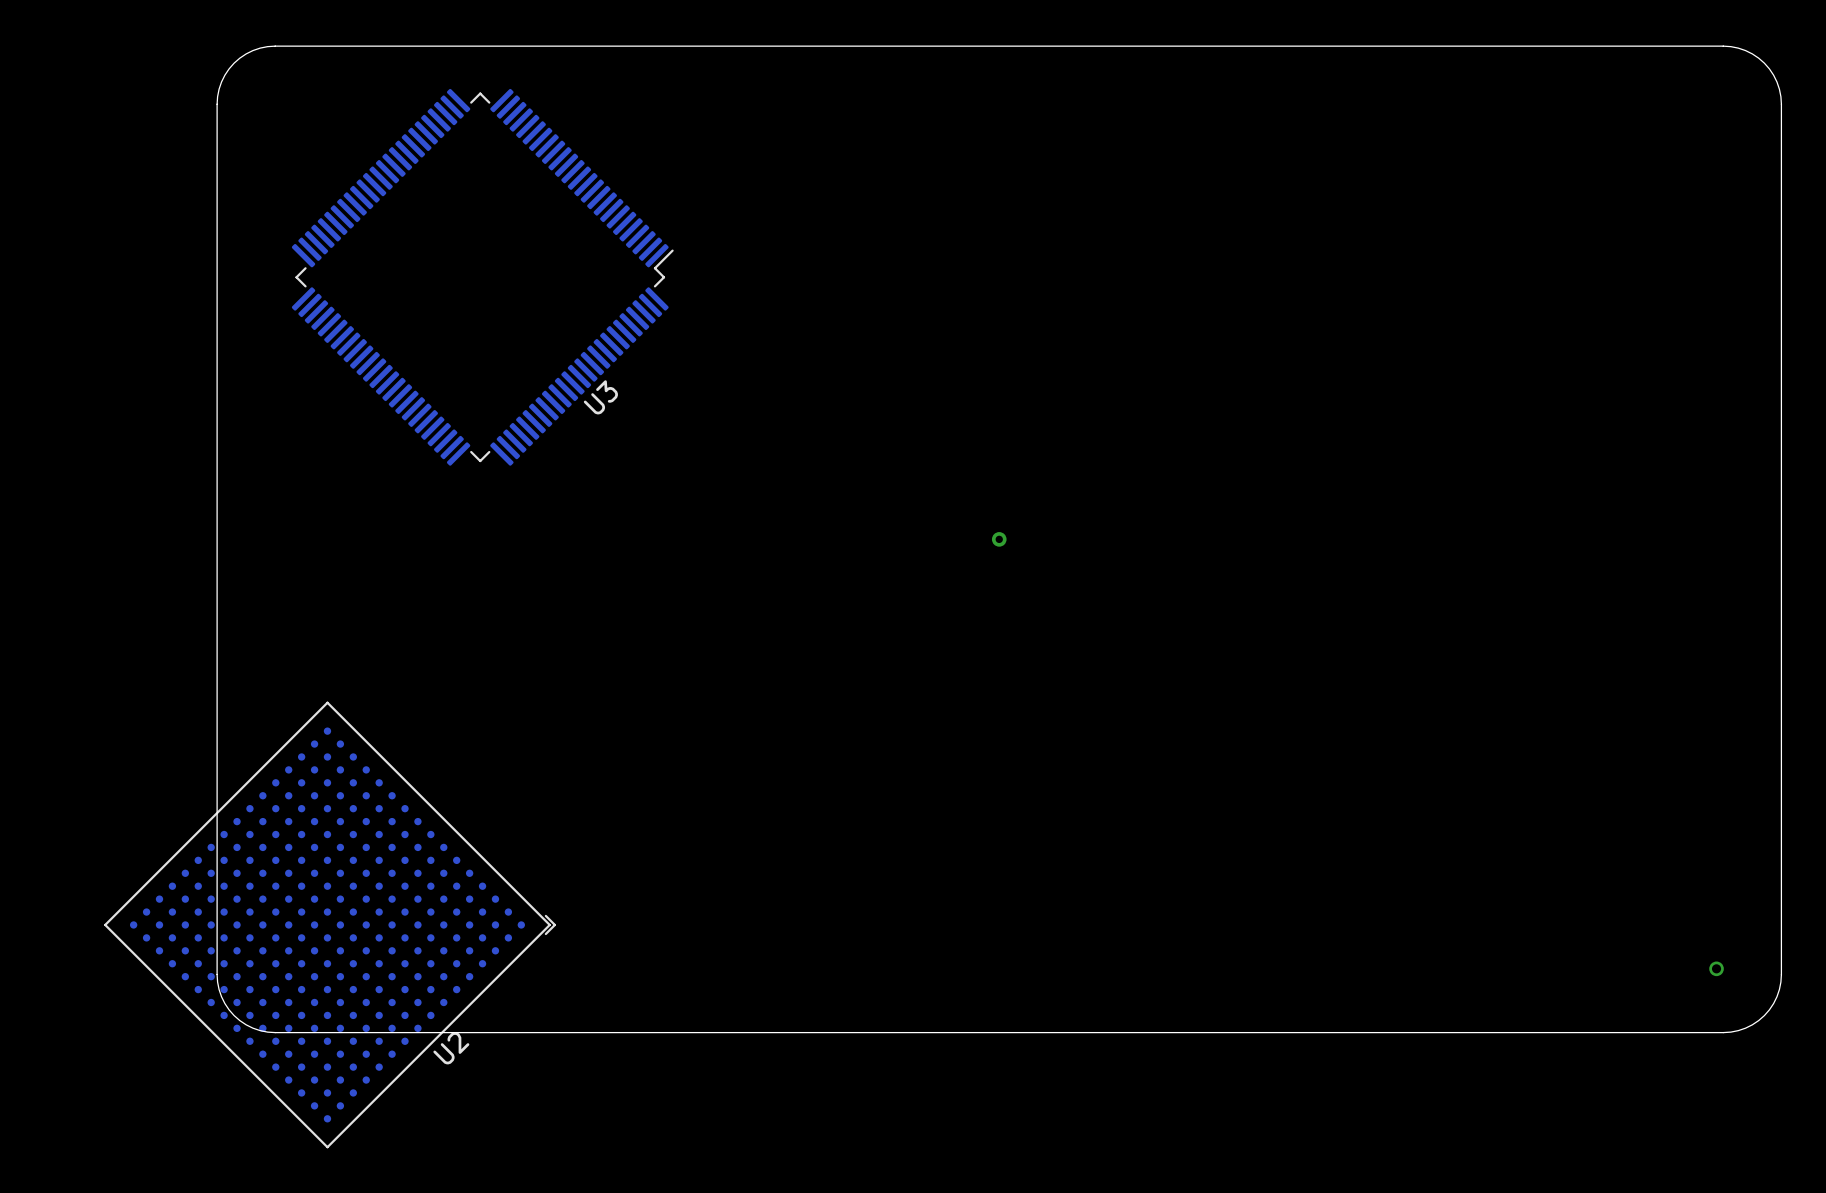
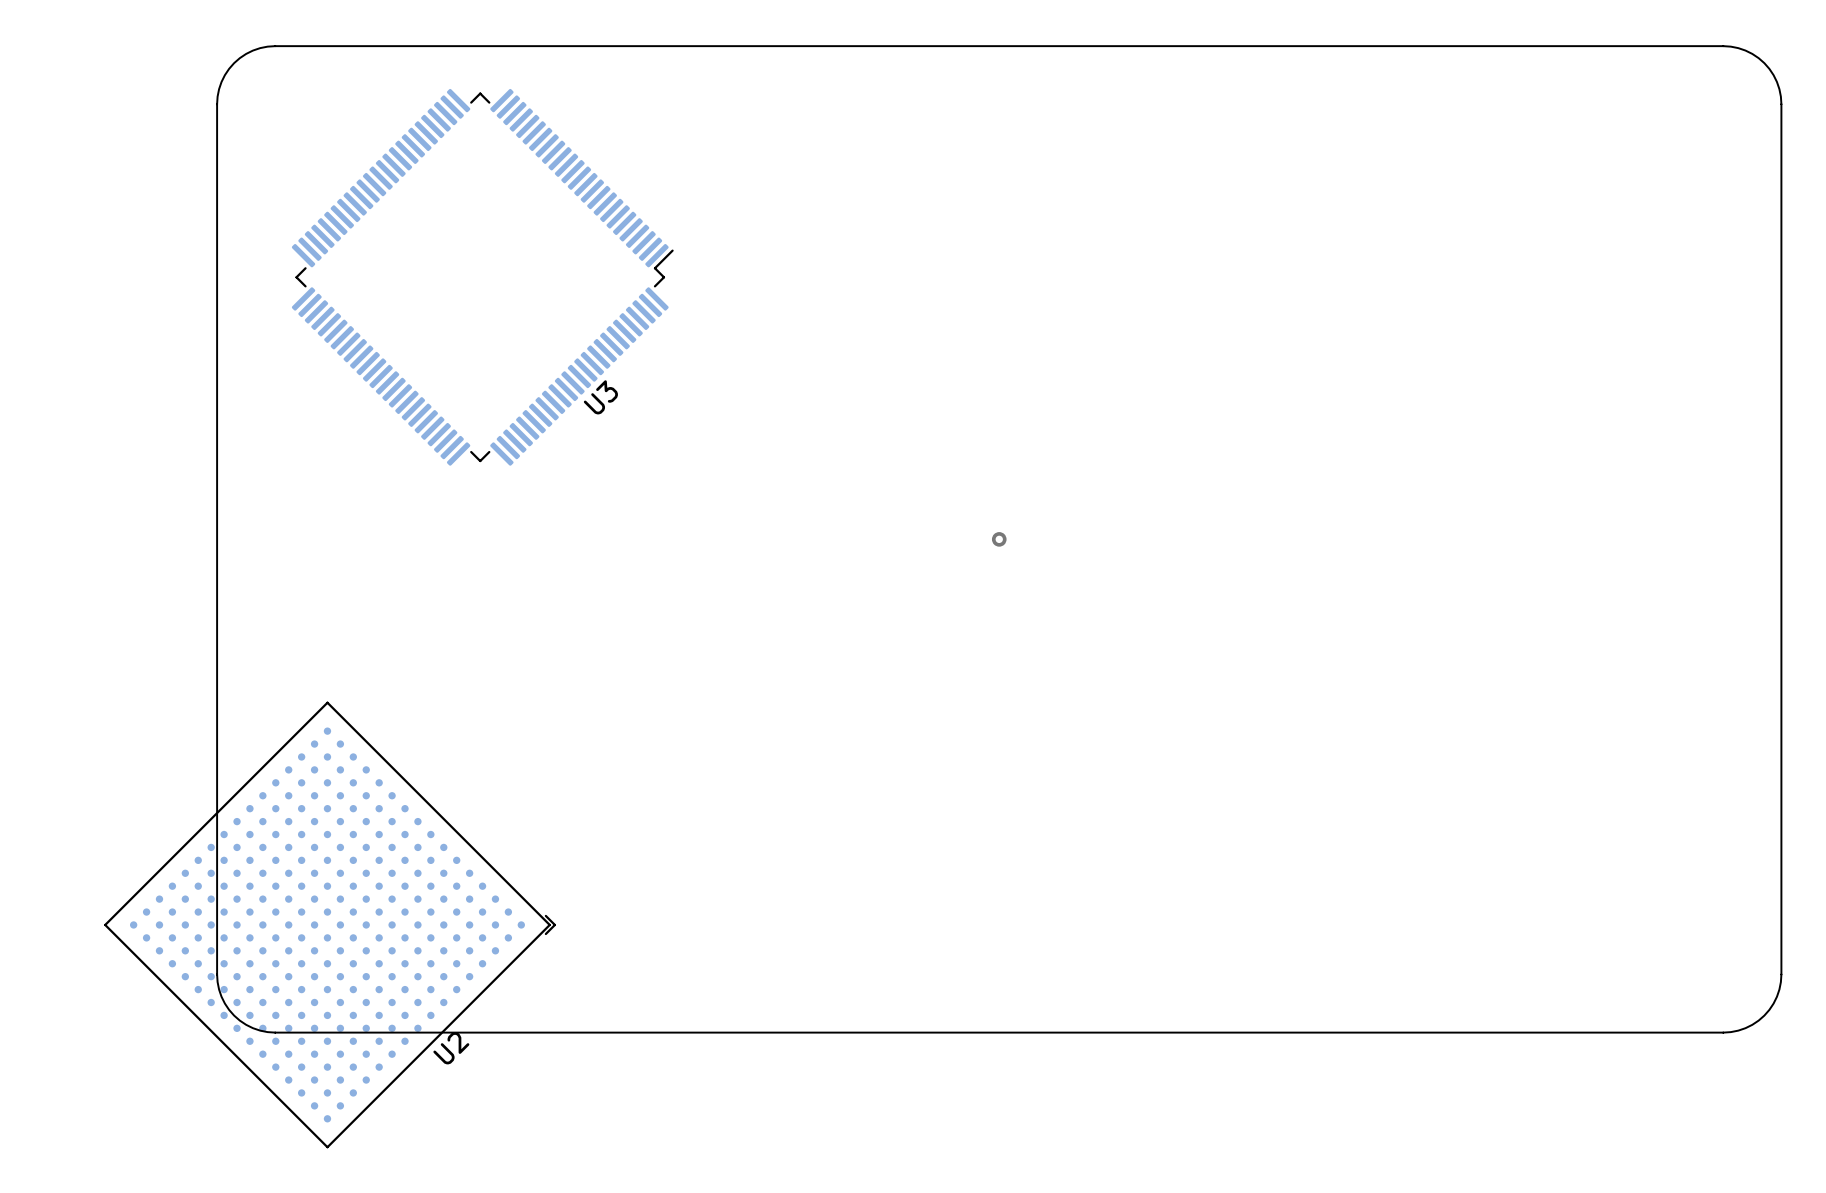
part: (1716, 968) -> none

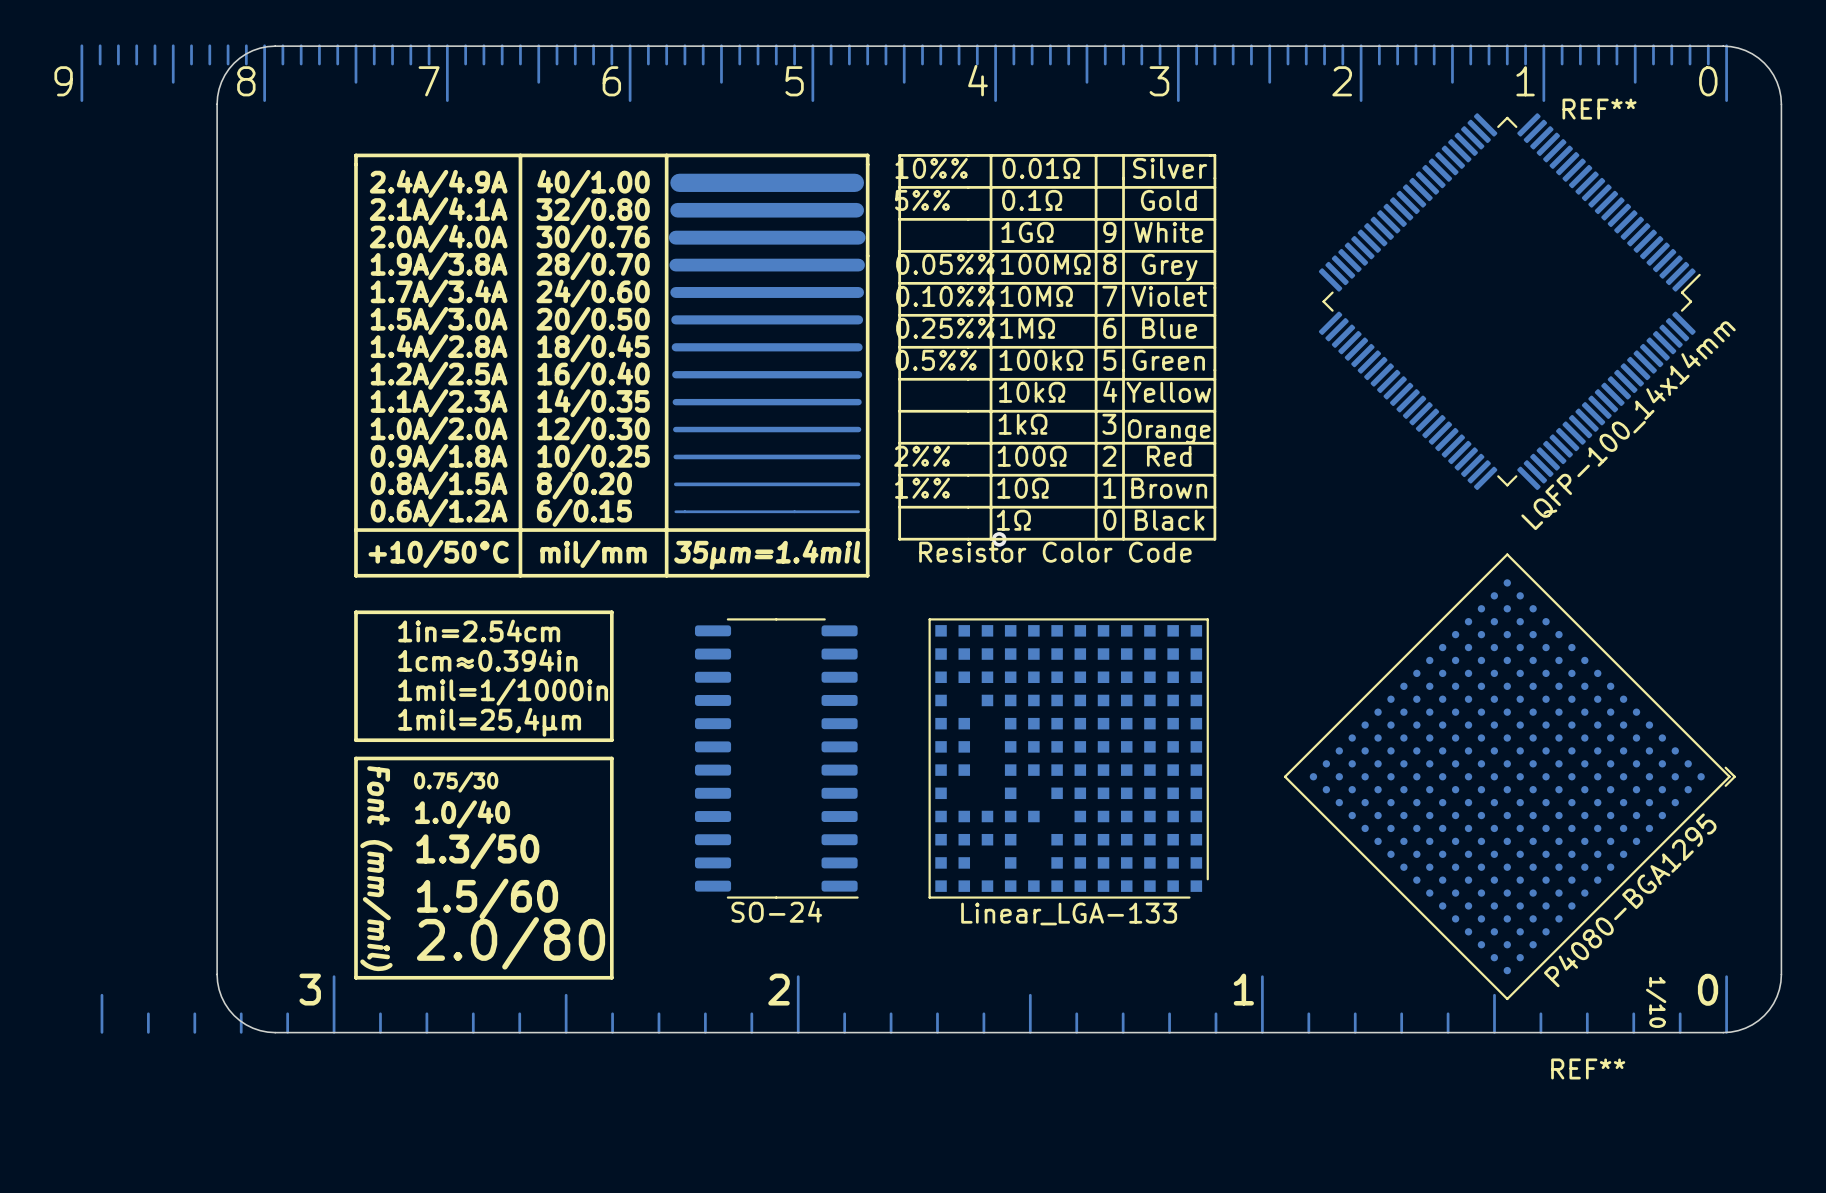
REF**: none -> (904, 73)
drawing: none -> [898, 154, 1217, 541]
line: none -> (520, 155) (520, 575)
line: none -> (666, 155) (666, 575)
line: none -> (867, 155) (867, 575) (355, 575) (355, 155) (867, 155)
track: none -> (854, 182) (679, 182)
text: none -> 2.4A/4.9A (438, 183)
text: none -> 40/1.00 (593, 183)
track: none -> (856, 210) (677, 210)
text: none -> 2.1A/4.1A (438, 211)
text: none -> 32/0.80 (593, 211)
track: none -> (858, 237) (675, 237)
text: none -> 2.0A/4.0A (438, 238)
text: none -> 30/0.76 (593, 238)
track: none -> (858, 265) (675, 265)
text: none -> 1.9A/3.8A (439, 266)
text: none -> 28/0.70 (593, 266)
U3: (482, 277) -> none
track: none -> (858, 292) (675, 292)
text: none -> 1.7A/3.4A (439, 293)
text: none -> 24/0.60 (593, 293)
LQFP-100_14x14mm: none -> (1509, 301)
track: none -> (858, 319) (675, 319)
text: none -> 1.5A/3.0A (439, 320)
text: none -> 20/0.50 (593, 320)
track: none -> (858, 347) (675, 347)
text: none -> 1.4A/2.8A (439, 348)
text: none -> 18/0.45 (593, 348)
track: none -> (858, 374) (675, 374)
text: none -> 1.2A/2.5A (439, 375)
text: none -> 16/0.40 (593, 375)
track: none -> (858, 402) (675, 402)
text: none -> 1.1A/2.3A (439, 403)
text: none -> 14/0.35 (593, 403)
track: none -> (858, 429) (675, 429)
text: none -> 1.0A/2.0A (439, 430)
text: none -> 12/0.30 (593, 430)
track: none -> (858, 456) (675, 456)
text: none -> 0.9A/1.8A (439, 458)
text: none -> 10/0.25 (593, 458)
track: none -> (858, 484) (675, 484)
text: none -> 0.8A/1.5A (439, 485)
text: none -> 8/0.20 (584, 485)
track: none -> (858, 511) (675, 511)
text: none -> 0.6A/1.2A (439, 512)
text: none -> 6/0.15 (584, 512)
line: none -> (867, 530) (355, 530)
text: none -> +10/50°C (438, 553)
text: none -> mil/mm (593, 553)
text: none -> 35µm=1.4mil (767, 554)
line: none -> (611, 612) (611, 740) (355, 740) (355, 612) (611, 612)
text: none -> 1in=2.54cm (479, 631)
text: none -> 1cm≈0.394in (487, 660)
text: none -> 1mil=1/1000in (503, 692)
text: none -> 1mil=25,4µm (489, 722)
line: none -> (611, 758) (355, 758) (355, 977) (611, 977) (611, 758)
SO-24: none -> (776, 758)
Linear_LGA-133: none -> (1068, 758)
P4080-BGA1295: none -> (1509, 776)
text: none -> 0.75/30 (456, 782)
text: none -> 1.0/40 (462, 814)
text: none -> 1.3/50 (477, 851)
text: none -> Font (mm/mil) (376, 868)
text: none -> 1.5/60 (487, 898)
U2: (330, 924) -> none
text: none -> 2.0/80 (511, 943)
REF**: none -> (914, 1004)

